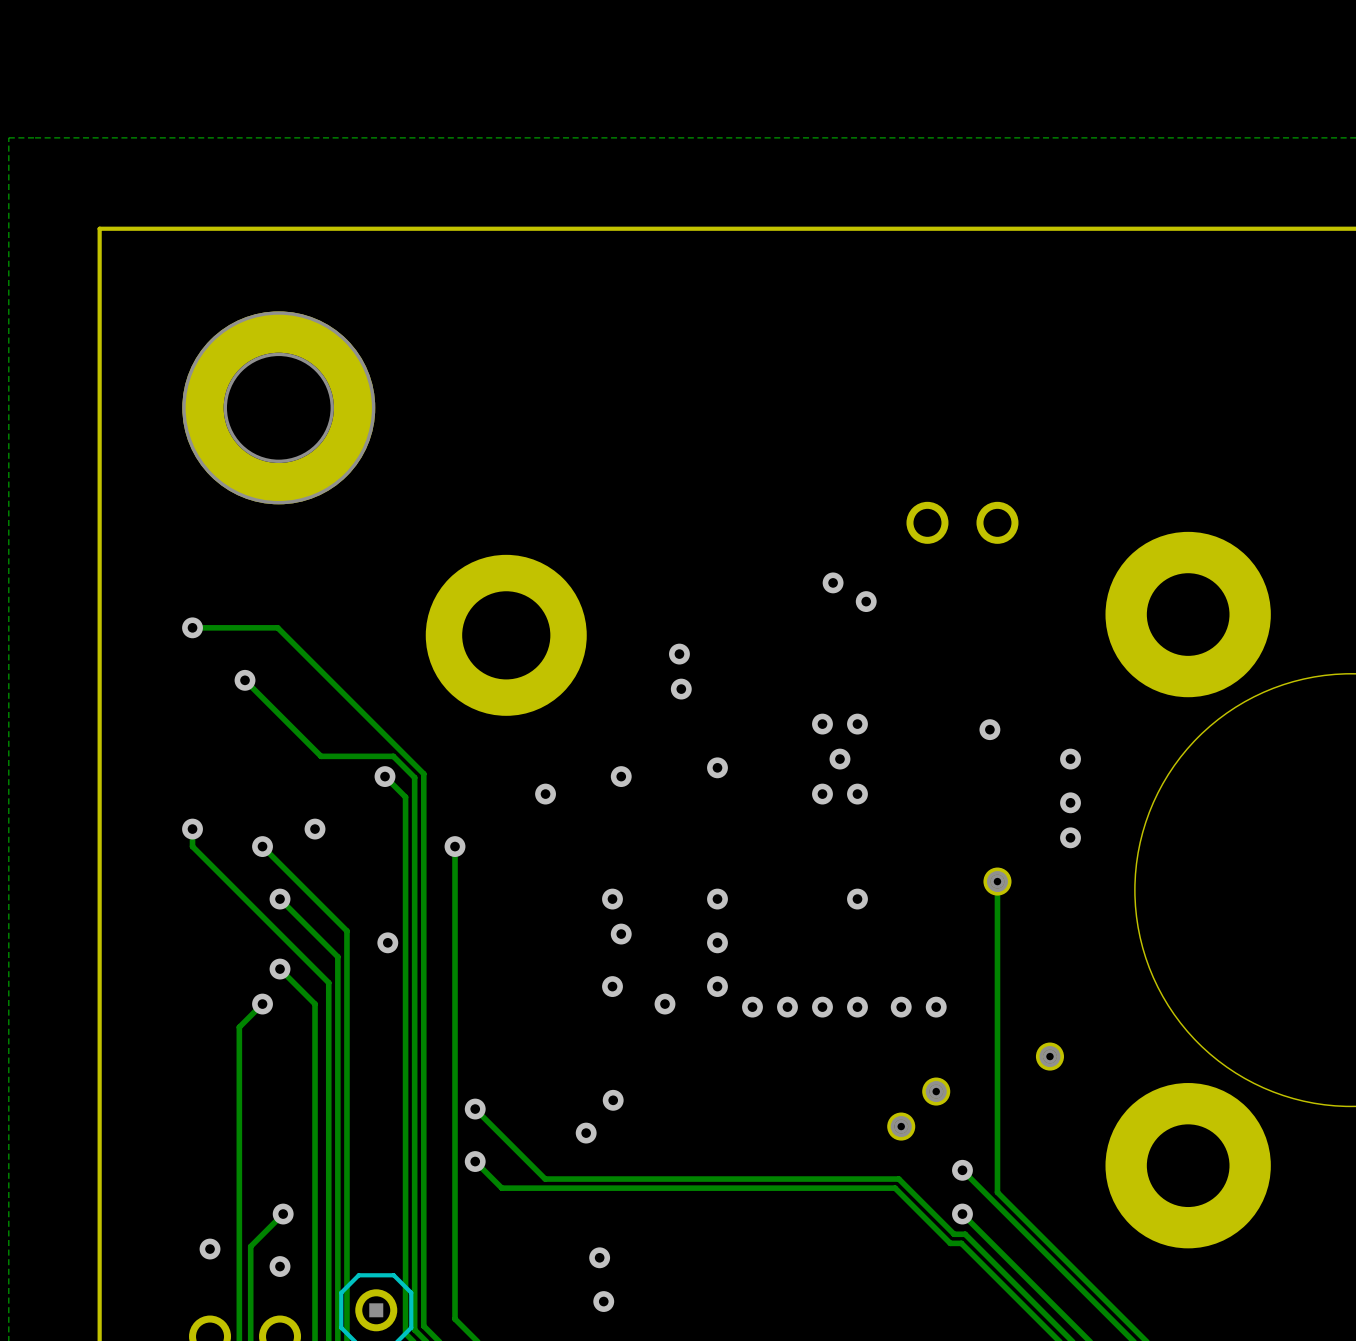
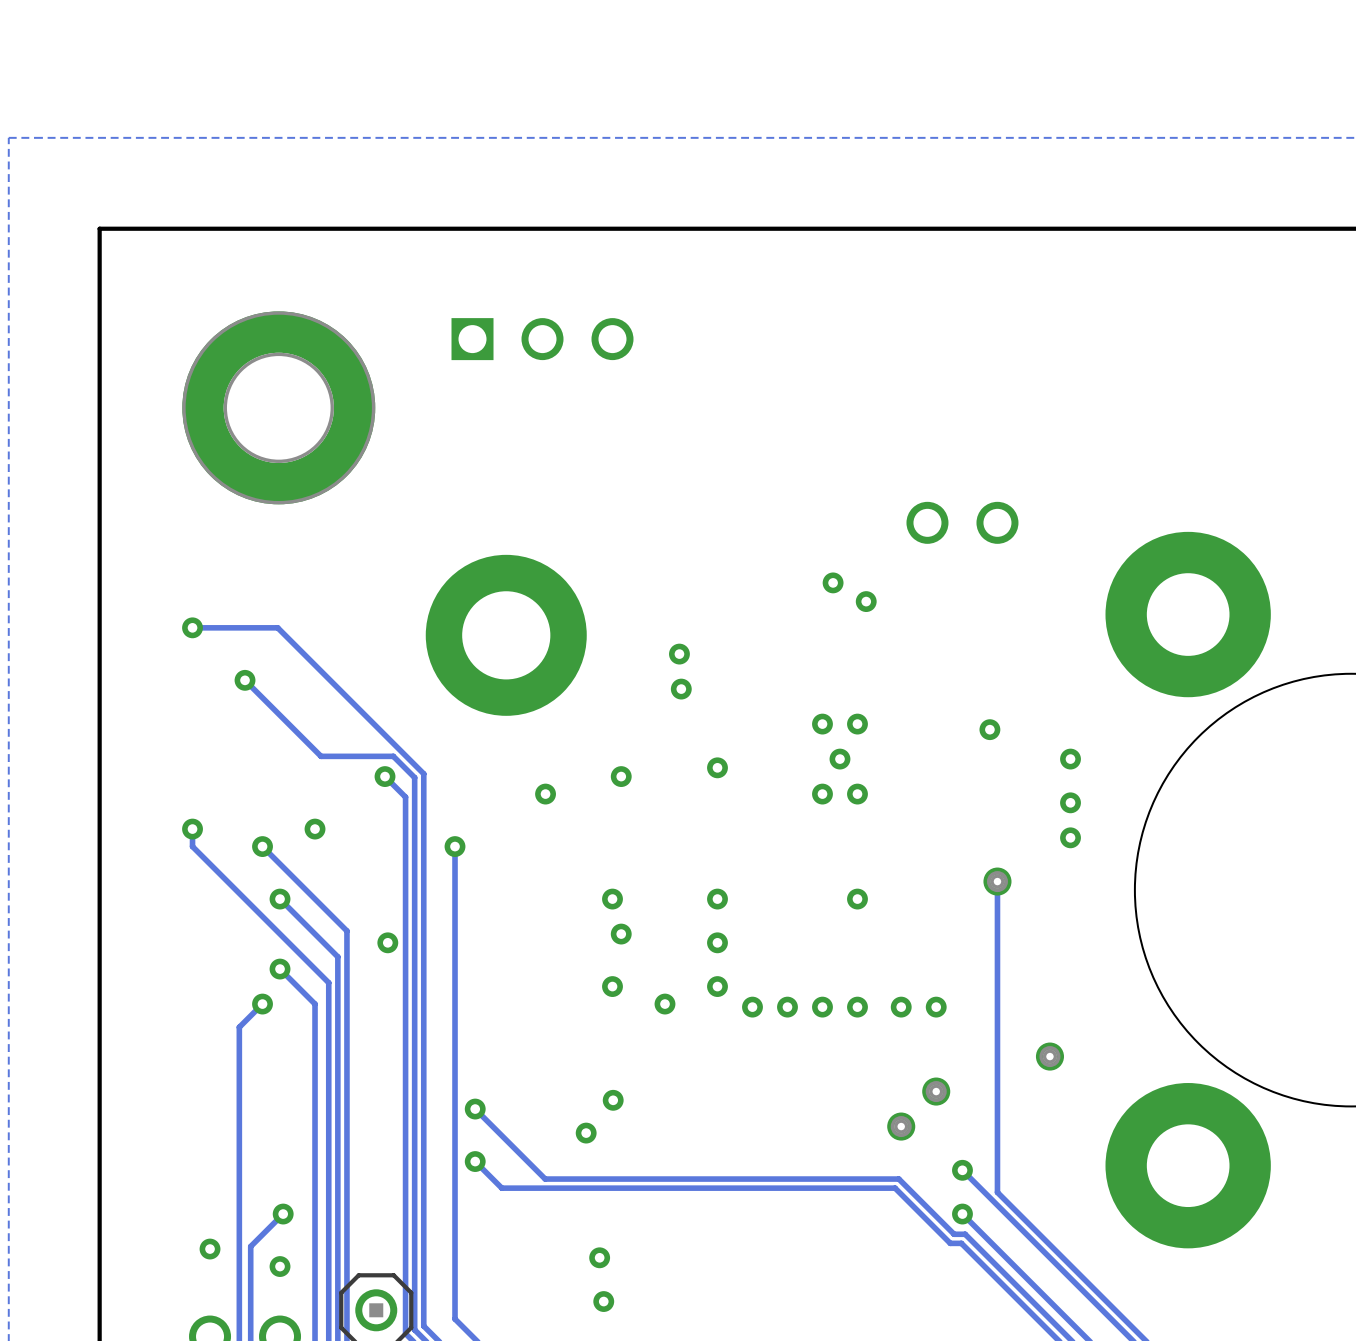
part: none -> (542, 339)

